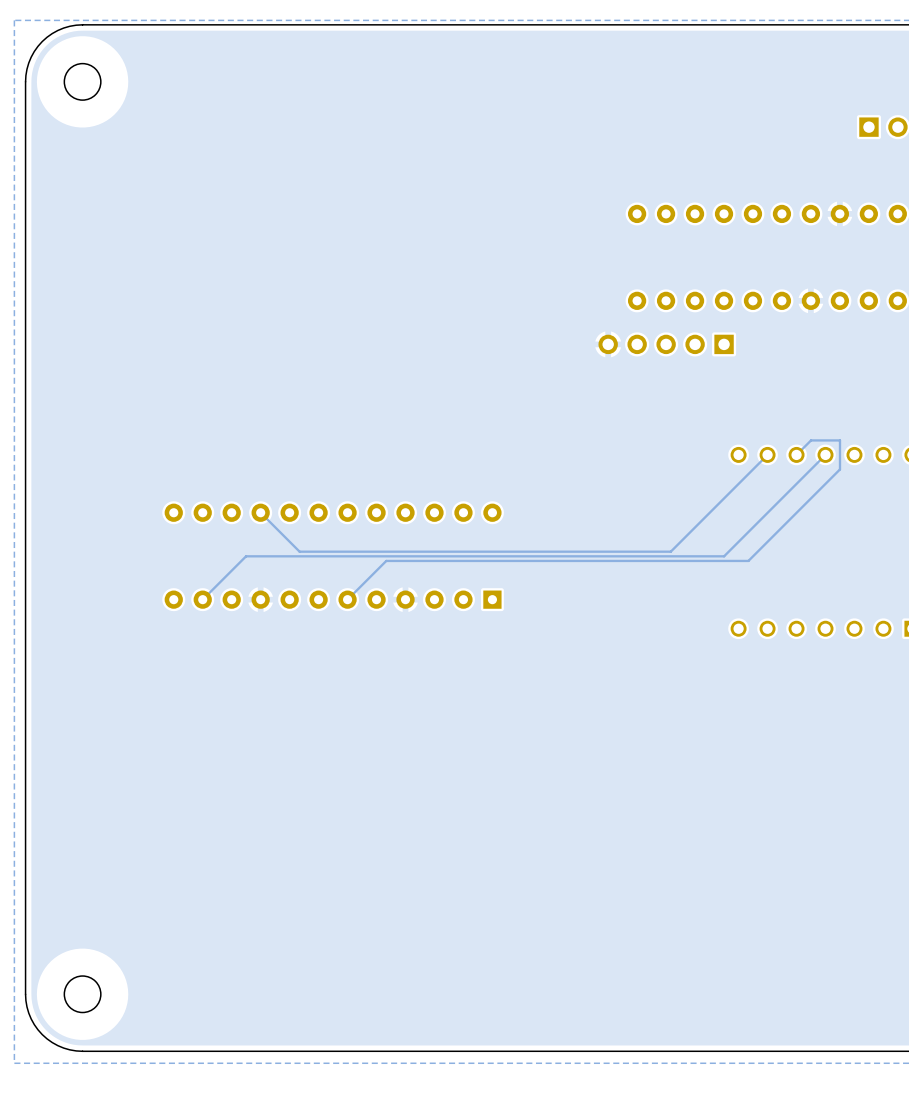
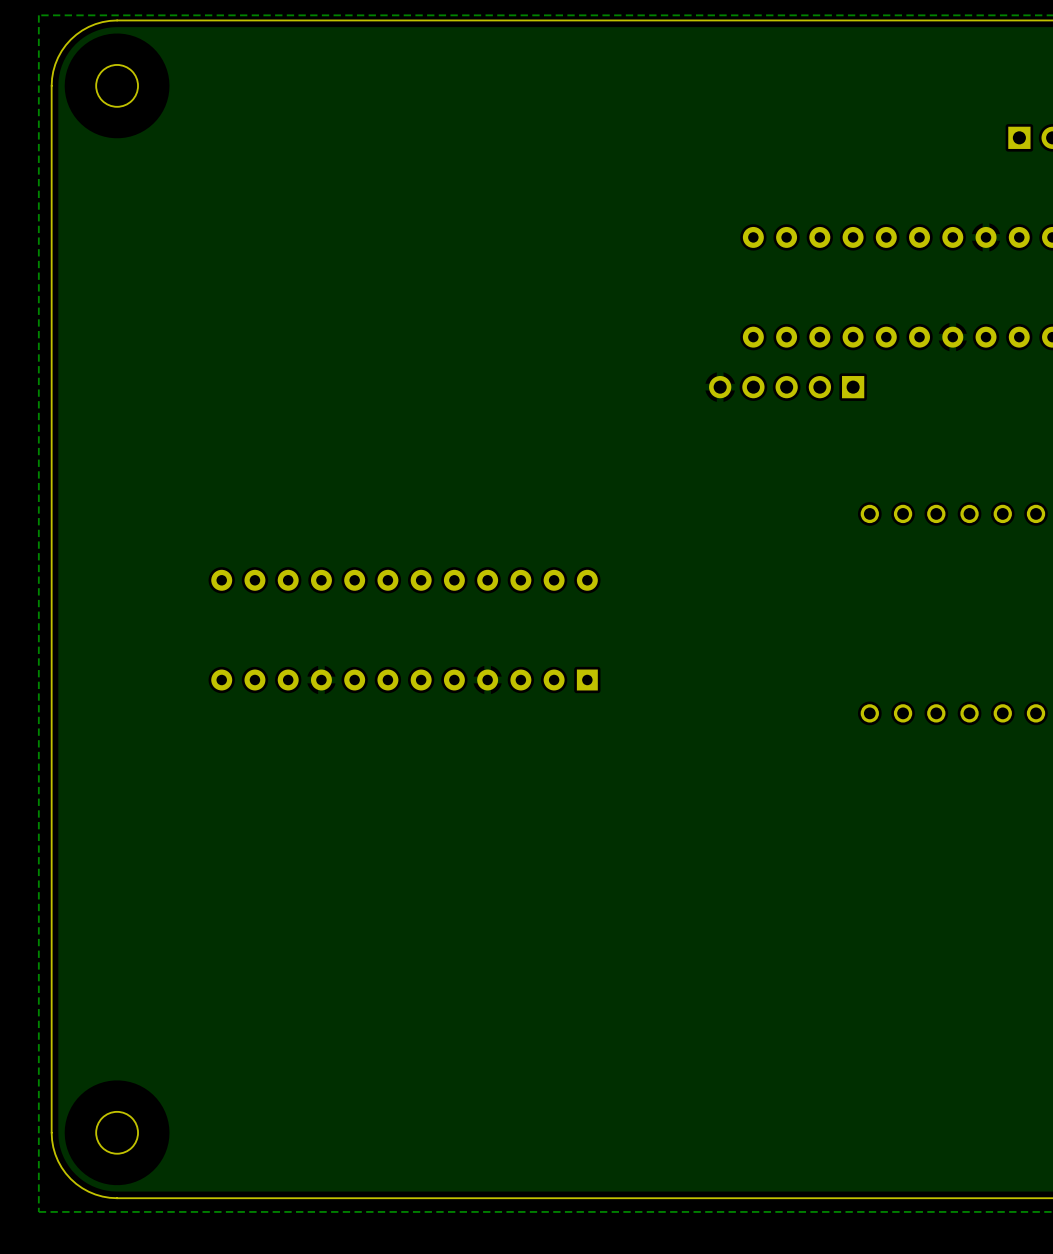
track: (767, 454) (670, 551) (299, 551) (260, 512) -> none
track: (796, 454) (811, 440) (839, 440) (839, 469) (748, 560) (386, 560) (347, 599) -> none
track: (825, 454) (724, 556) (246, 556) (202, 599) -> none

